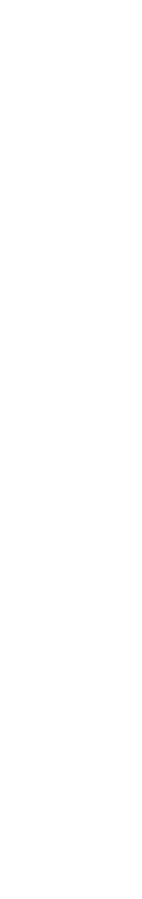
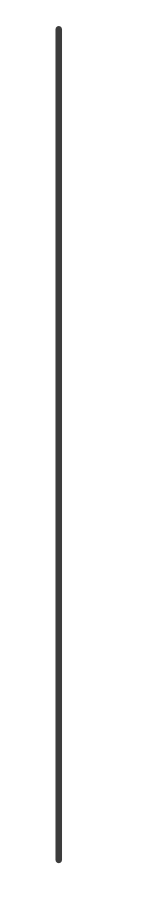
line: none -> (58, 29) (58, 859)

